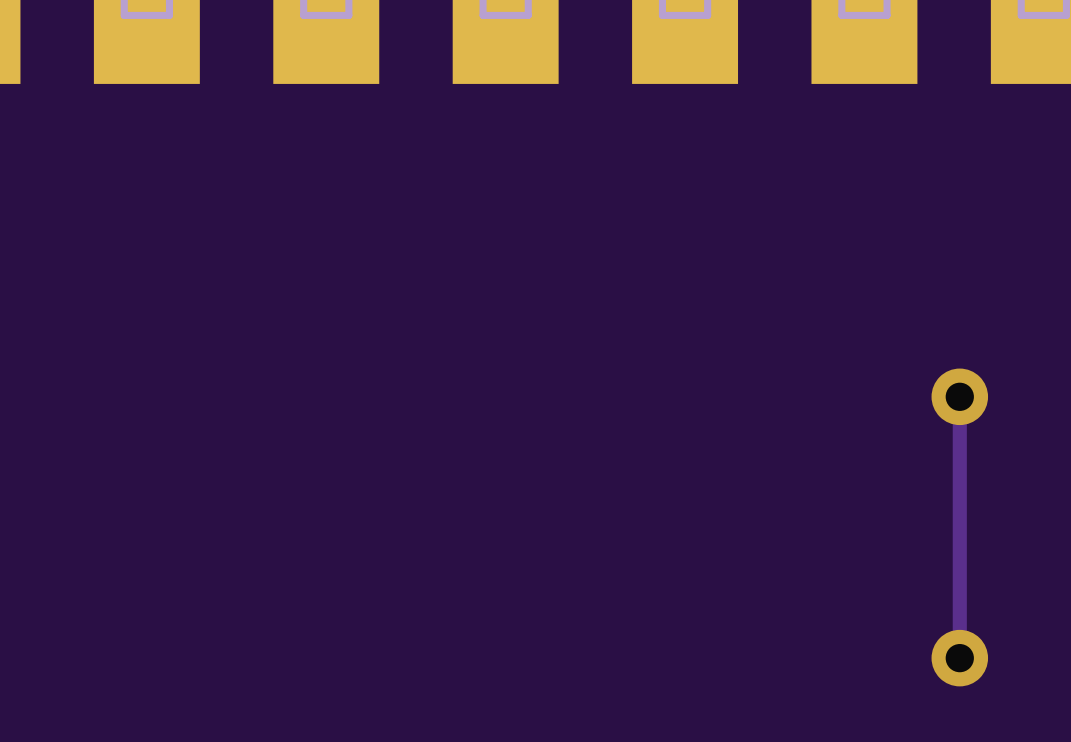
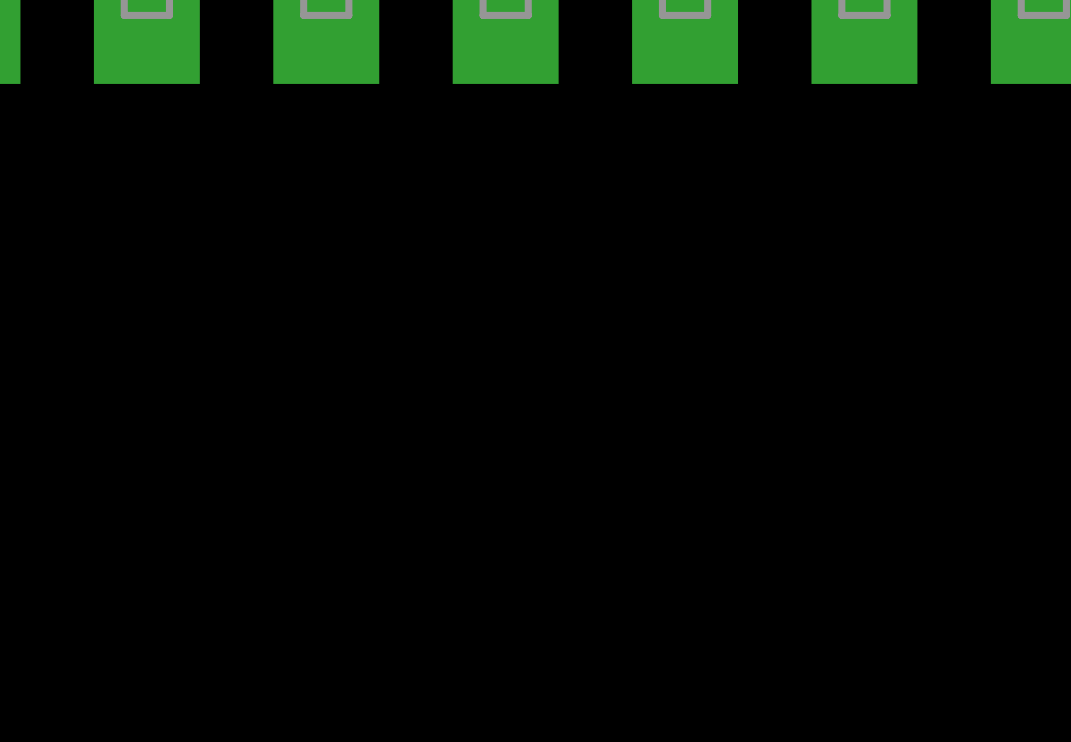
track: (959, 396) (959, 658) -> none
via: (959, 396) -> none
via: (959, 658) -> none

